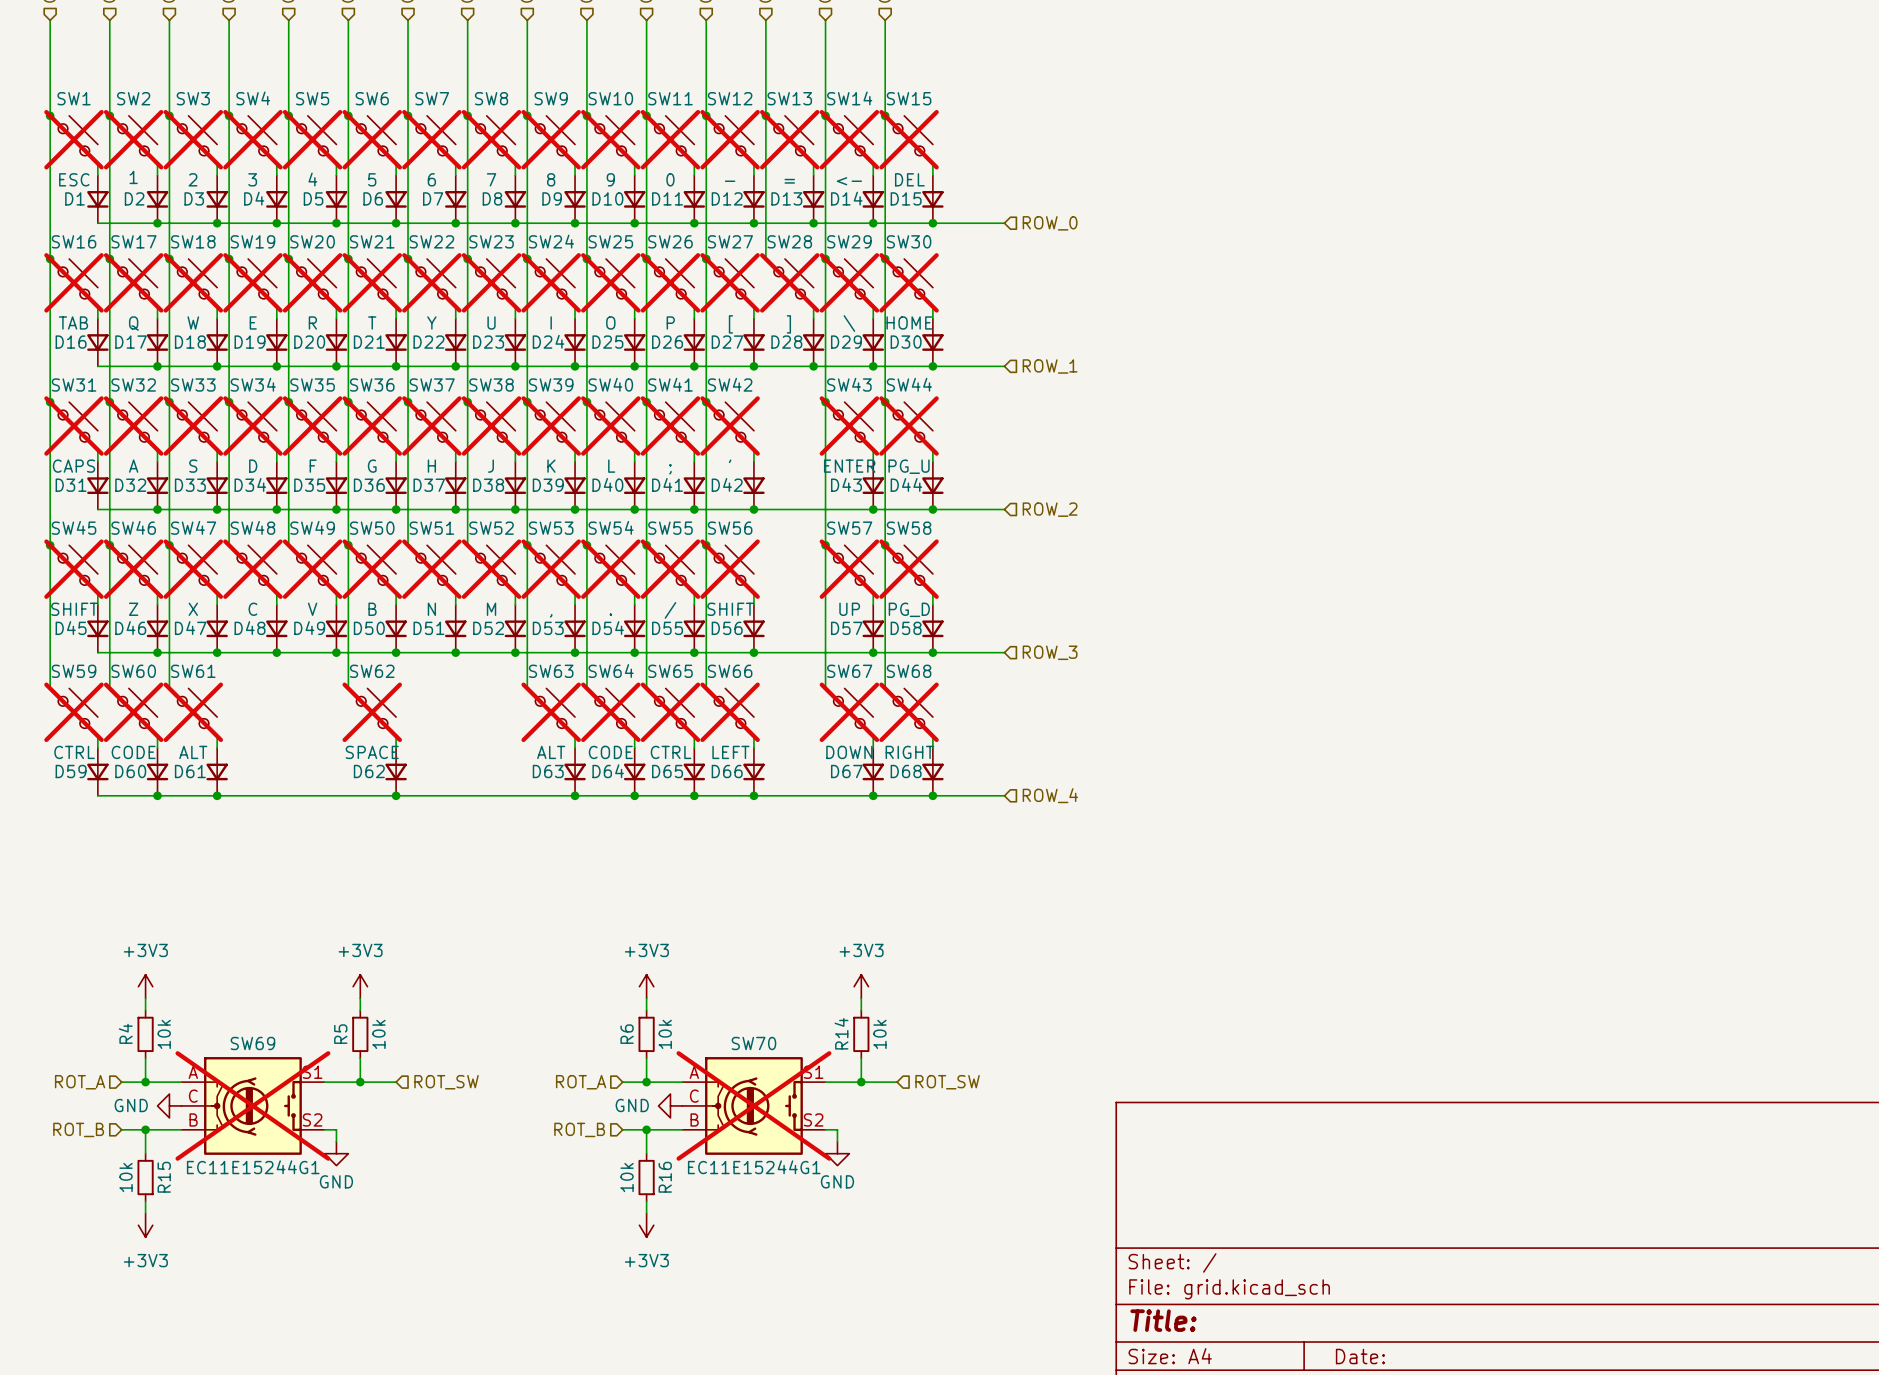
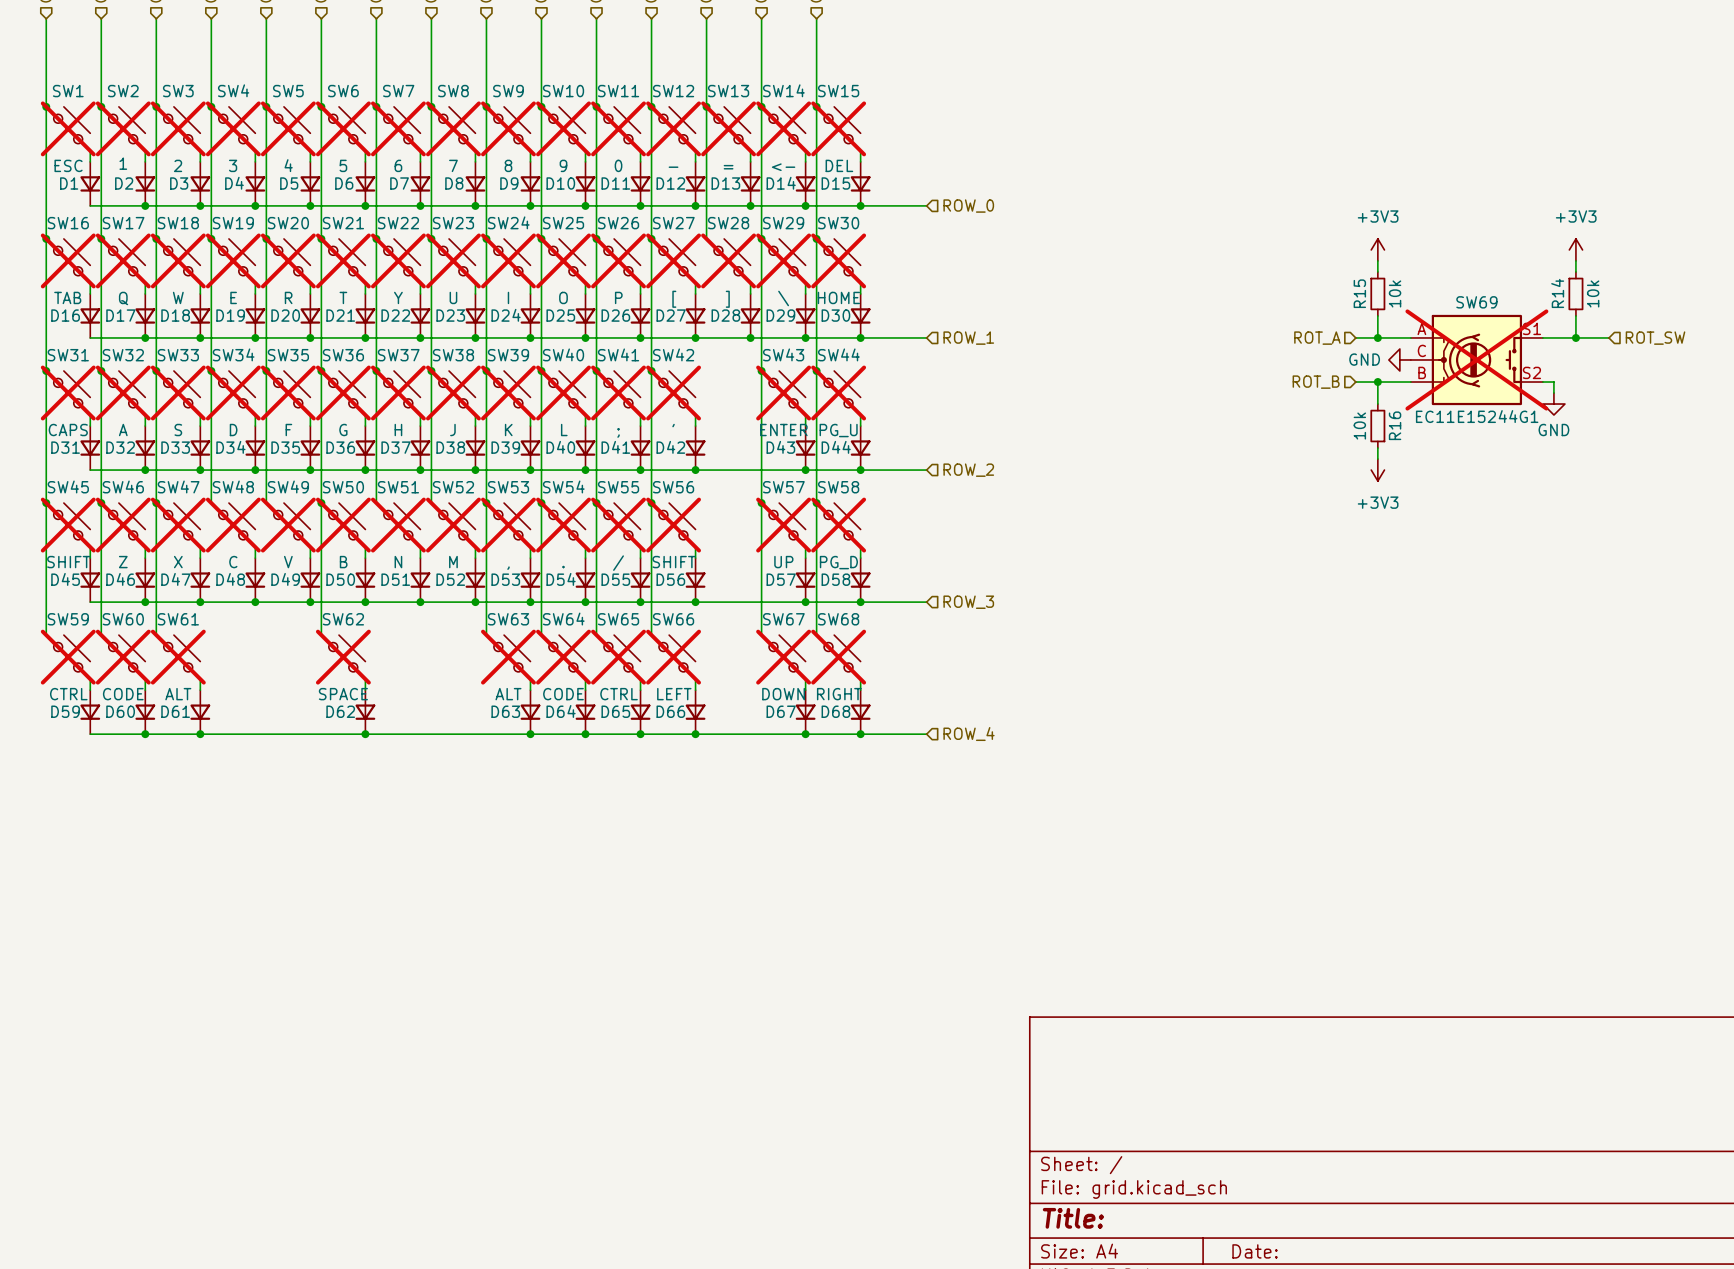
power symbol: none -> +3V3 (1377, 249)
power symbol: none -> +3V3 (1575, 249)
wire: none -> (1377, 260) (1377, 271)
wire: none -> (1575, 260) (1575, 271)
wire: none -> (1377, 315) (1377, 337)
wire: none -> (1575, 315) (1575, 337)
hierarchical label: none -> ROT_A (1317, 338)
wire: none -> (1355, 337) (1410, 337)
junction: none -> (1377, 337)
wire: none -> (1542, 337) (1608, 337)
junction: none -> (1575, 337)
hierarchical label: none -> ROT_SW (1655, 338)
power symbol: none -> GND (1399, 359)
hierarchical label: none -> ROT_B (1316, 382)
wire: none -> (1355, 382) (1410, 382)
wire: none -> (1377, 382) (1377, 404)
junction: none -> (1377, 382)
wire: none -> (1542, 382) (1553, 382) (1553, 393)
power symbol: none -> GND (1553, 404)
wire: none -> (1377, 448) (1377, 459)
power symbol: none -> +3V3 (1377, 470)
power symbol: +3V3 (145, 986) -> none
power symbol: +3V3 (360, 986) -> none
power symbol: +3V3 (646, 986) -> none
power symbol: +3V3 (861, 986) -> none
wire: (145, 998) (145, 1010) -> none
wire: (360, 998) (360, 1010) -> none
wire: (646, 998) (646, 1010) -> none
wire: (861, 998) (861, 1010) -> none
R4: 10k (145, 1034) -> none
R5: 10k (360, 1034) -> none
R6: 10k (646, 1034) -> none
R14 position: (861, 1034) -> (1575, 293)
wire: (145, 1058) (145, 1082) -> none
wire: (360, 1058) (360, 1082) -> none
wire: (646, 1058) (646, 1082) -> none
wire: (861, 1058) (861, 1082) -> none
hierarchical label: ROT_A (80, 1082) -> none
wire: (121, 1082) (181, 1082) -> none
junction: (145, 1082) -> none
wire: (324, 1082) (396, 1082) -> none
junction: (360, 1082) -> none
hierarchical label: ROT_SW (446, 1082) -> none
hierarchical label: ROT_A (581, 1082) -> none
wire: (622, 1082) (682, 1082) -> none
junction: (646, 1082) -> none
wire: (825, 1082) (897, 1082) -> none
junction: (861, 1082) -> none
hierarchical label: ROT_SW (947, 1082) -> none
power symbol: GND (169, 1105) -> none
SW69 position: (252, 1105) -> (1476, 359)
power symbol: GND (670, 1105) -> none
SW70: EC11E15244G1 (753, 1105) -> none
hierarchical label: ROT_B (78, 1129) -> none
wire: (121, 1129) (181, 1129) -> none
wire: (145, 1129) (145, 1153) -> none
junction: (145, 1129) -> none
wire: (324, 1129) (336, 1129) (336, 1141) -> none
hierarchical label: ROT_B (579, 1129) -> none
wire: (622, 1129) (682, 1129) -> none
wire: (646, 1129) (646, 1153) -> none
junction: (646, 1129) -> none
wire: (825, 1129) (837, 1129) (837, 1141) -> none
power symbol: GND (336, 1153) -> none
power symbol: GND (837, 1153) -> none
R15 value position: 10k (126, 1177) -> 10k (1395, 293)
R15 position: (145, 1177) -> (1377, 293)
R15 name position: R15 (164, 1177) -> R15 (1359, 293)
R16 position: (646, 1177) -> (1377, 426)
wire: (145, 1201) (145, 1213) -> none
wire: (646, 1201) (646, 1213) -> none
power symbol: +3V3 (145, 1225) -> none
power symbol: +3V3 (646, 1225) -> none

